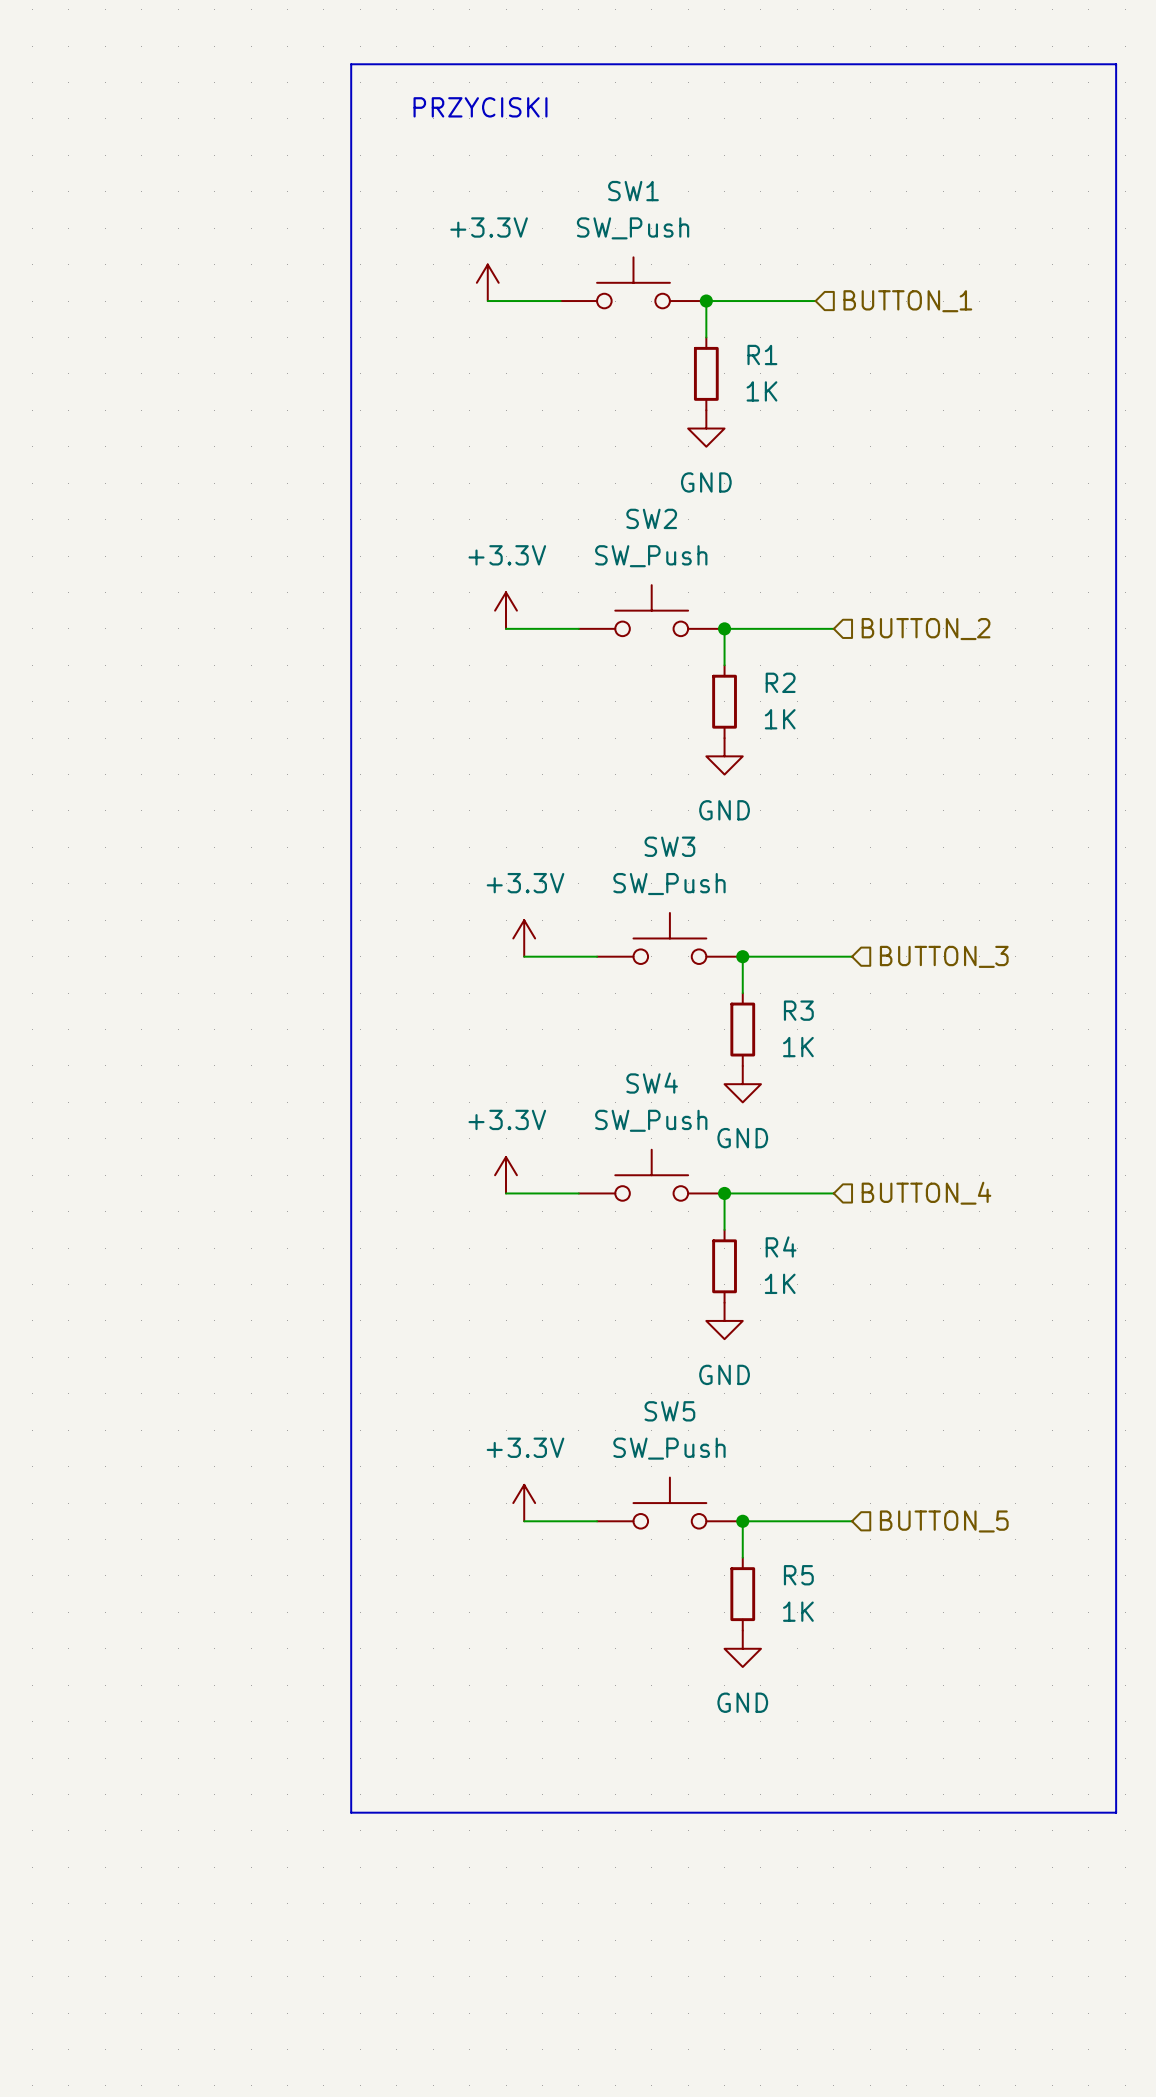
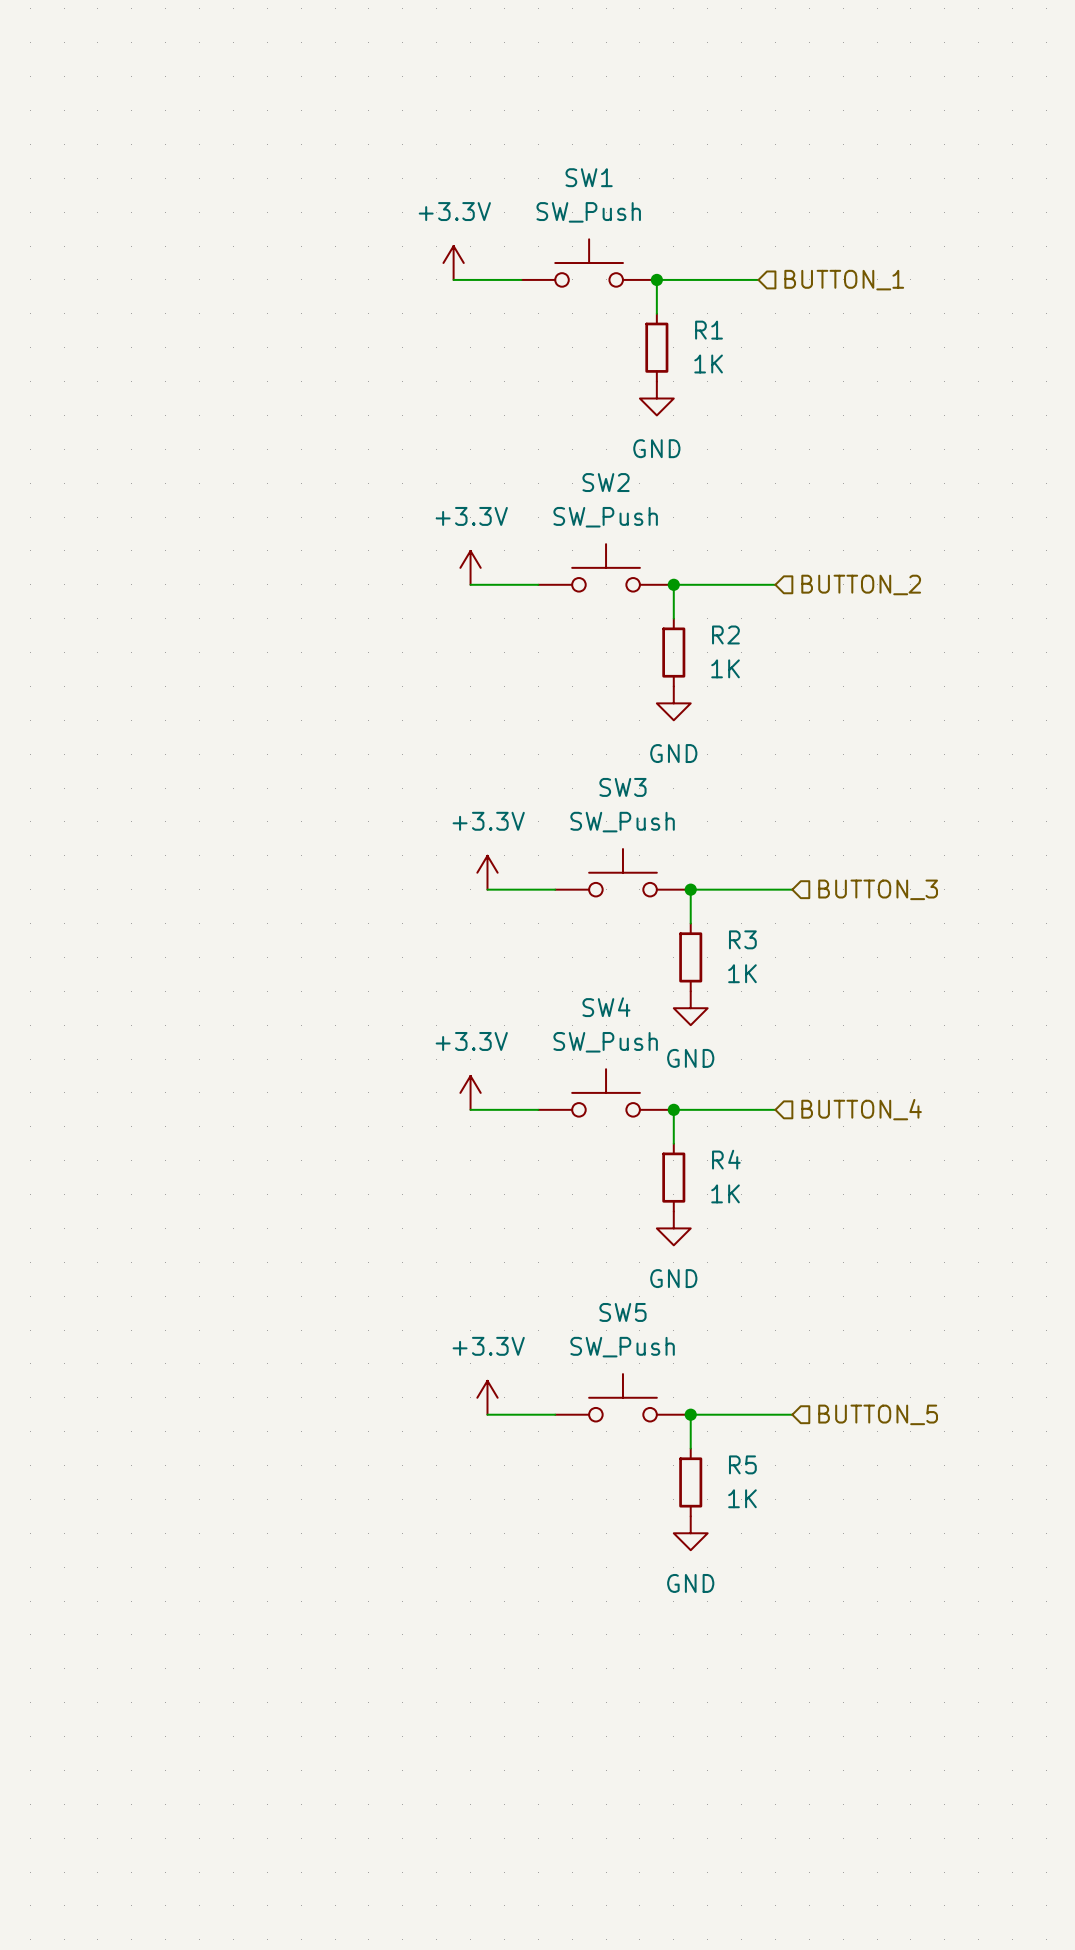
line: (351, 64) (1116, 64) (1116, 1812) (351, 1812) (351, 64) -> none
text: PRZYCISKI (480, 107) -> none

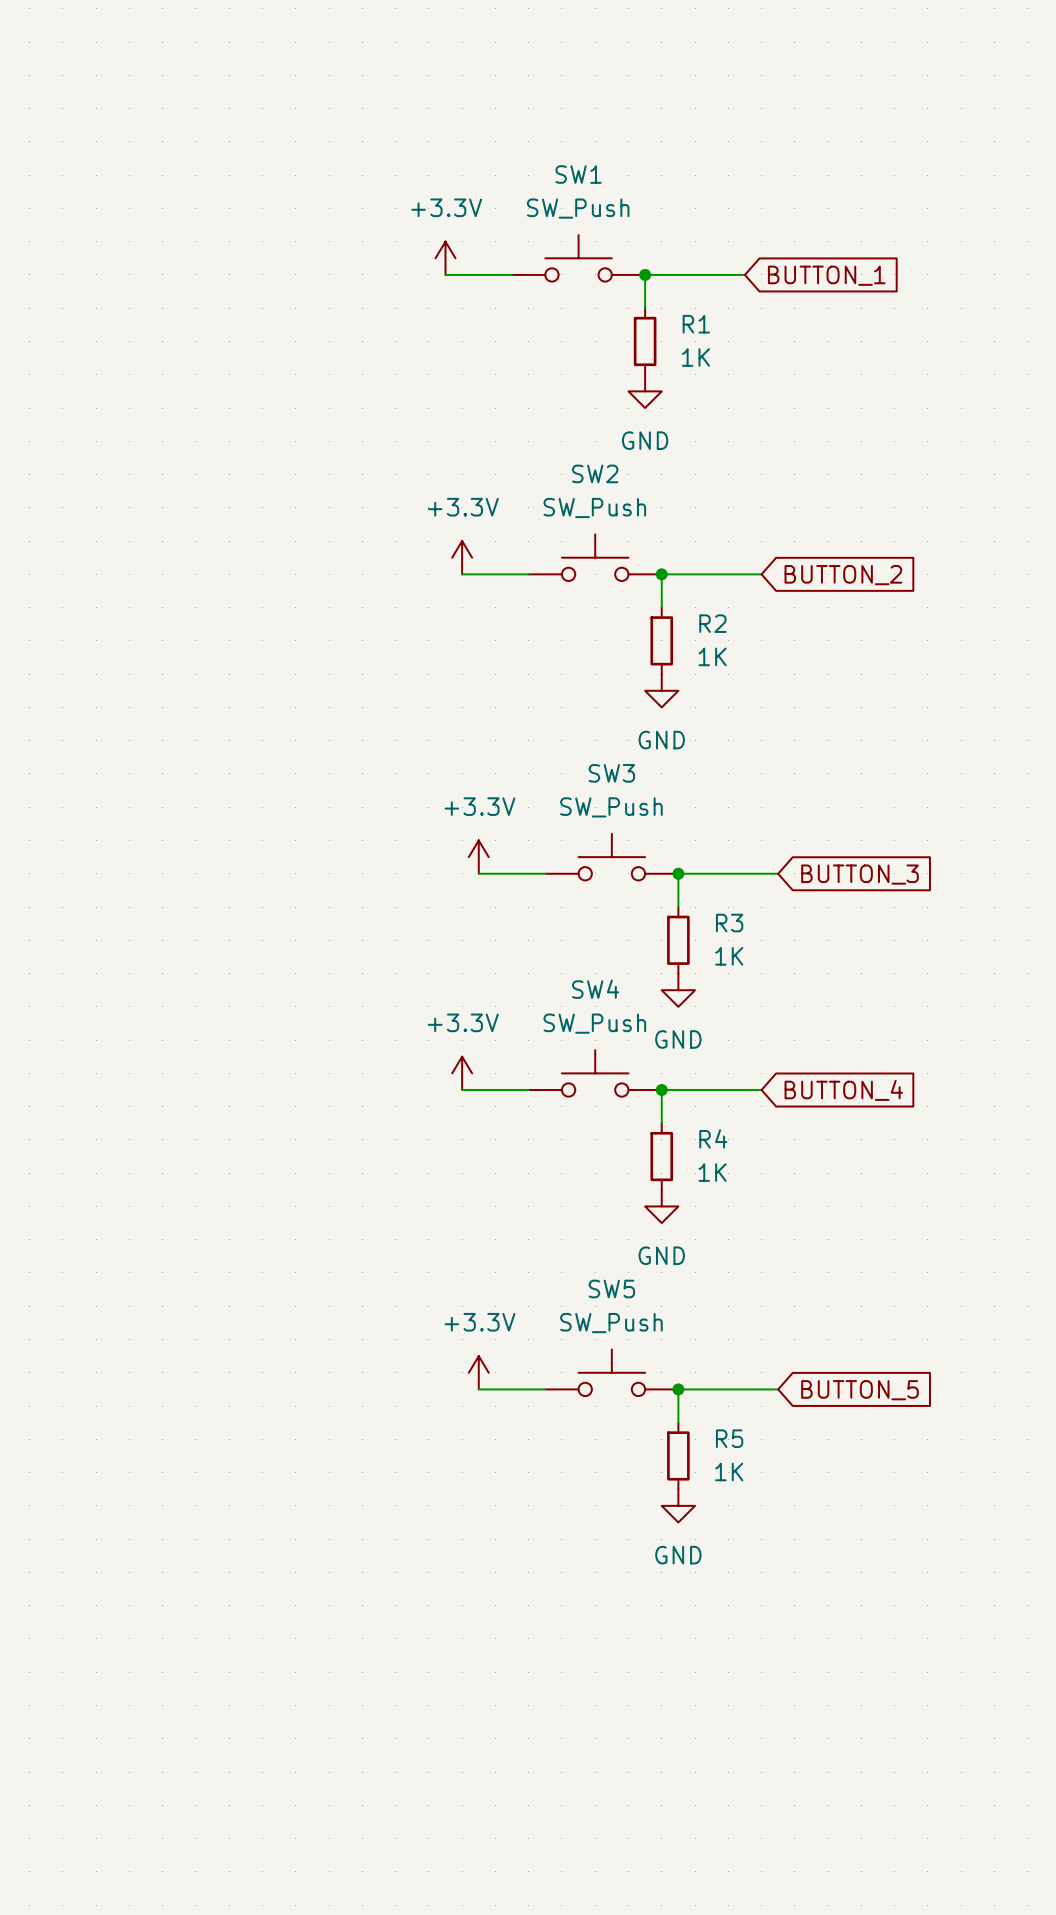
global label: none -> BUTTON_1 (826, 275)
hierarchical label: BUTTON_1 (844, 280) -> none
hierarchical label: BUTTON_2 (861, 584) -> none
global label: none -> BUTTON_2 (843, 575)
hierarchical label: BUTTON_3 (878, 889) -> none
global label: none -> BUTTON_3 (860, 874)
hierarchical label: BUTTON_4 (861, 1109) -> none
global label: none -> BUTTON_4 (843, 1090)
hierarchical label: BUTTON_5 (878, 1414) -> none
global label: none -> BUTTON_5 (860, 1390)

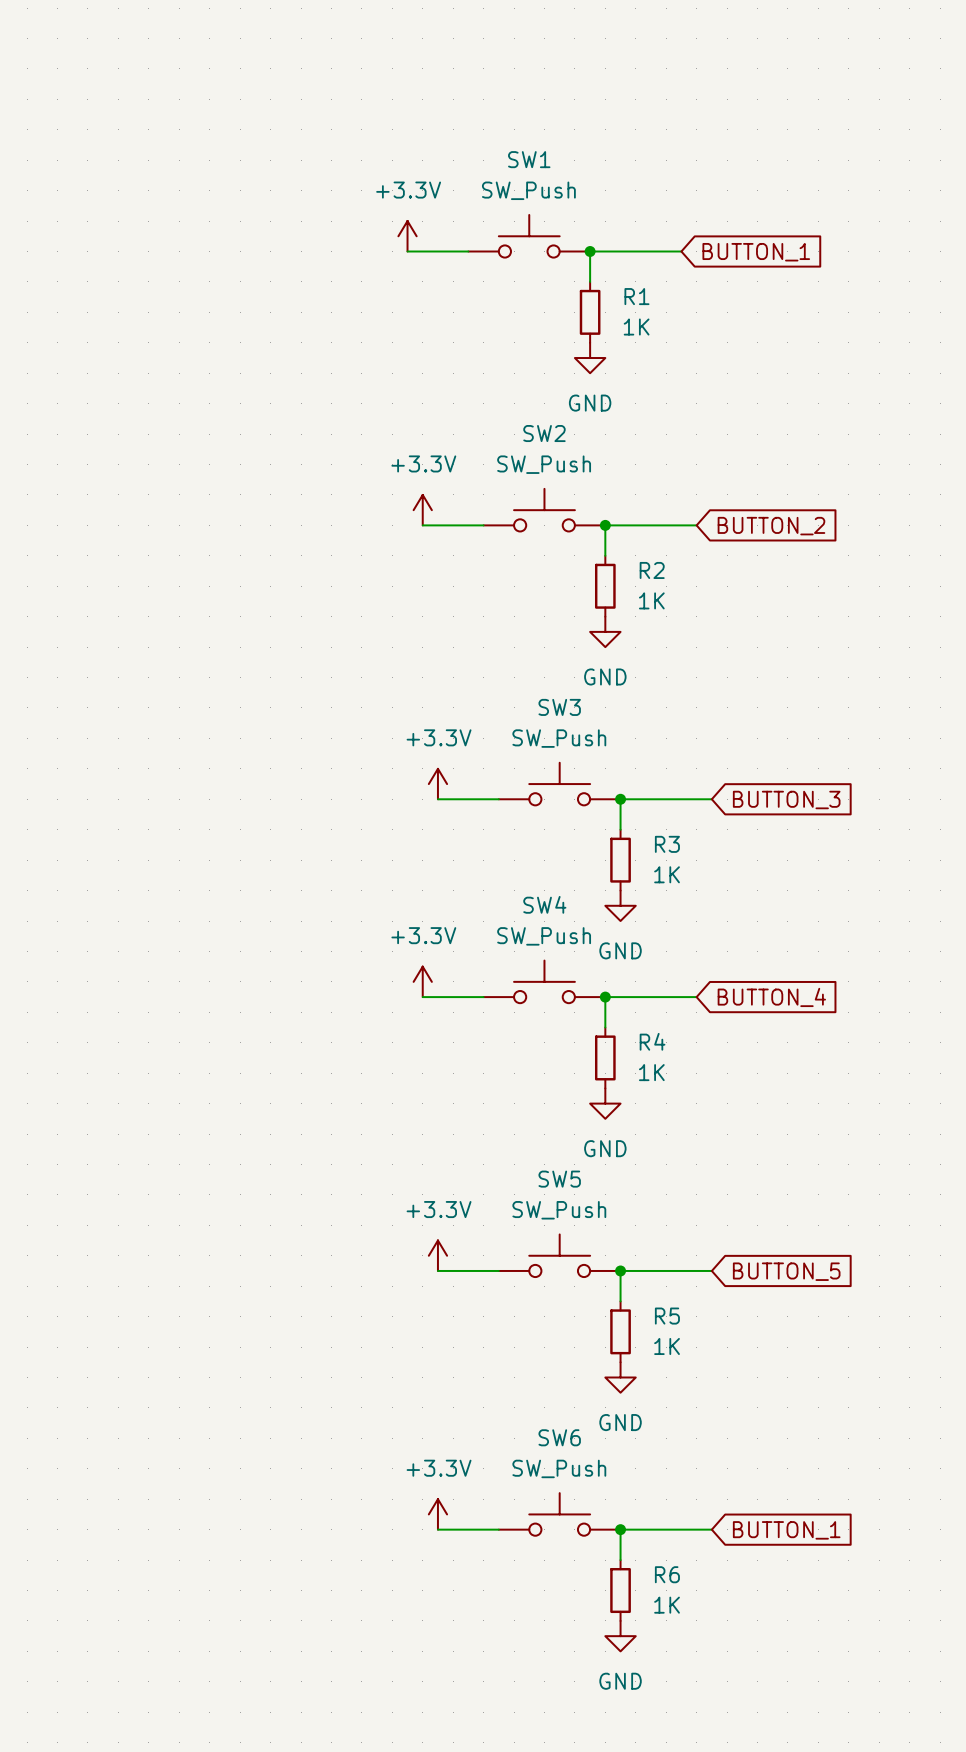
power symbol: none -> +3.3V (437, 1514)
SW6: none -> SW_Push (559, 1514)
wire: none -> (437, 1529) (498, 1529)
junction: none -> (620, 1529)
wire: none -> (711, 1529) (620, 1529) (620, 1560)
global label: none -> BUTTON_1 (786, 1530)
R6: none -> 1K (620, 1590)
power symbol: none -> GND (620, 1636)

